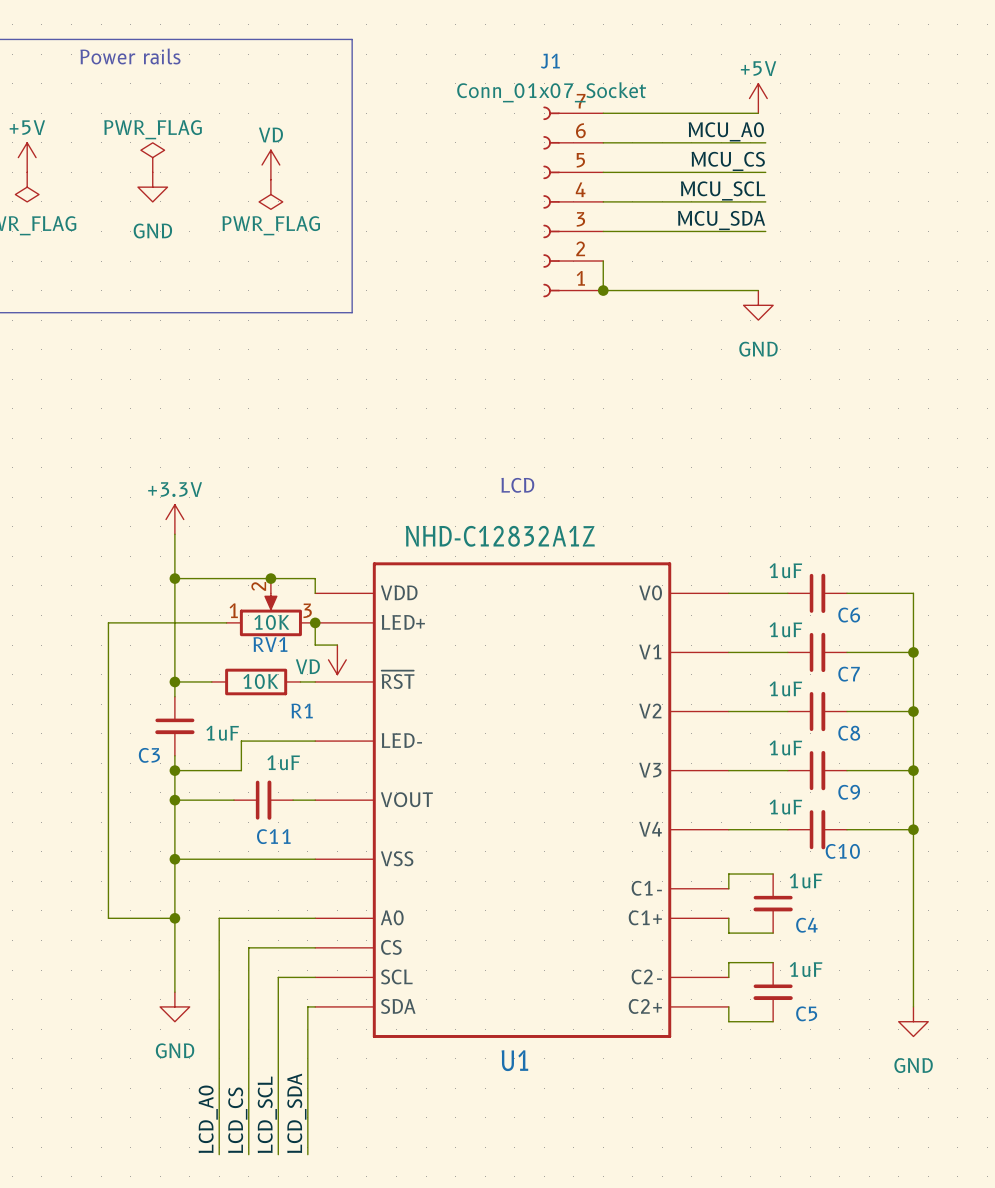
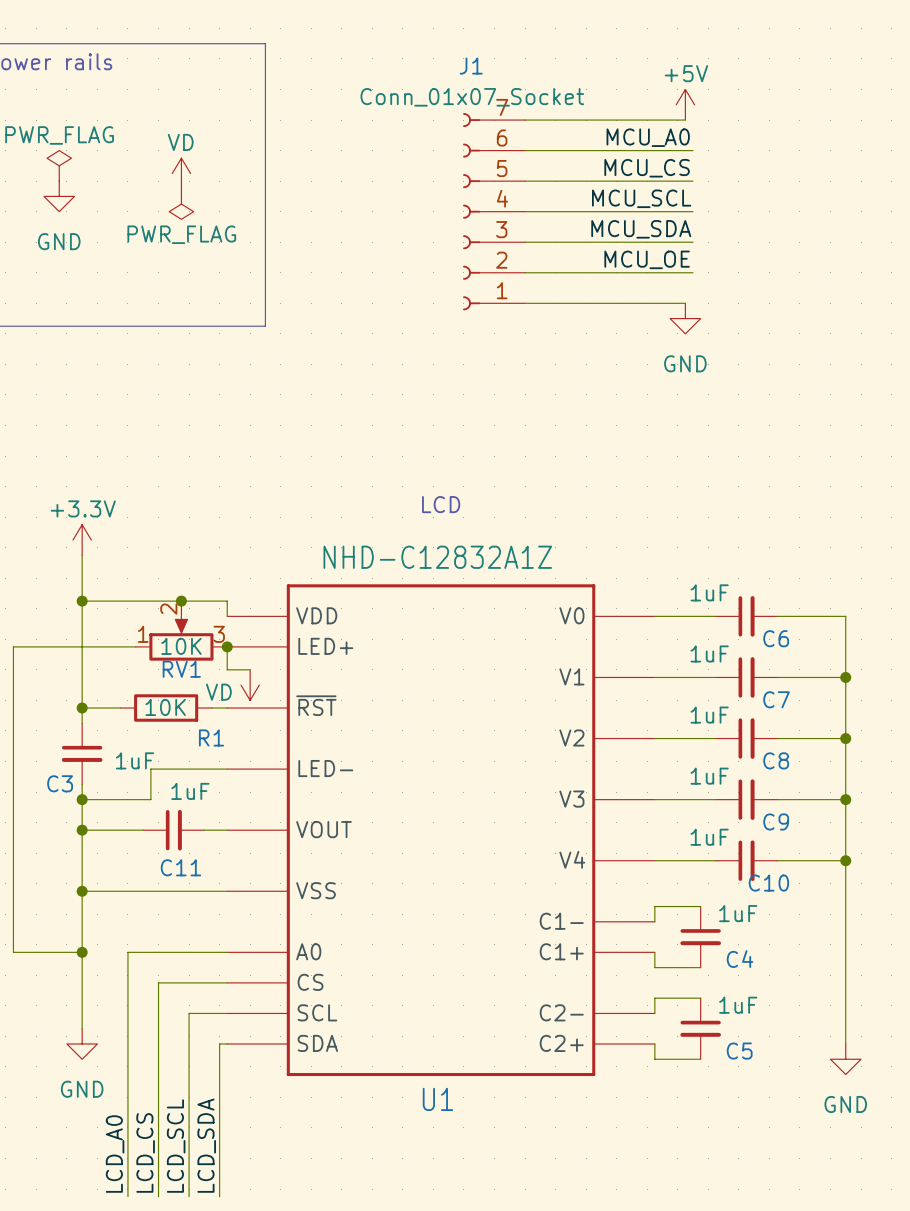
label: none -> MCU_OE (647, 259)
wire: (603, 261) (603, 290) -> (525, 272) (693, 272)
junction: (603, 290) -> none

